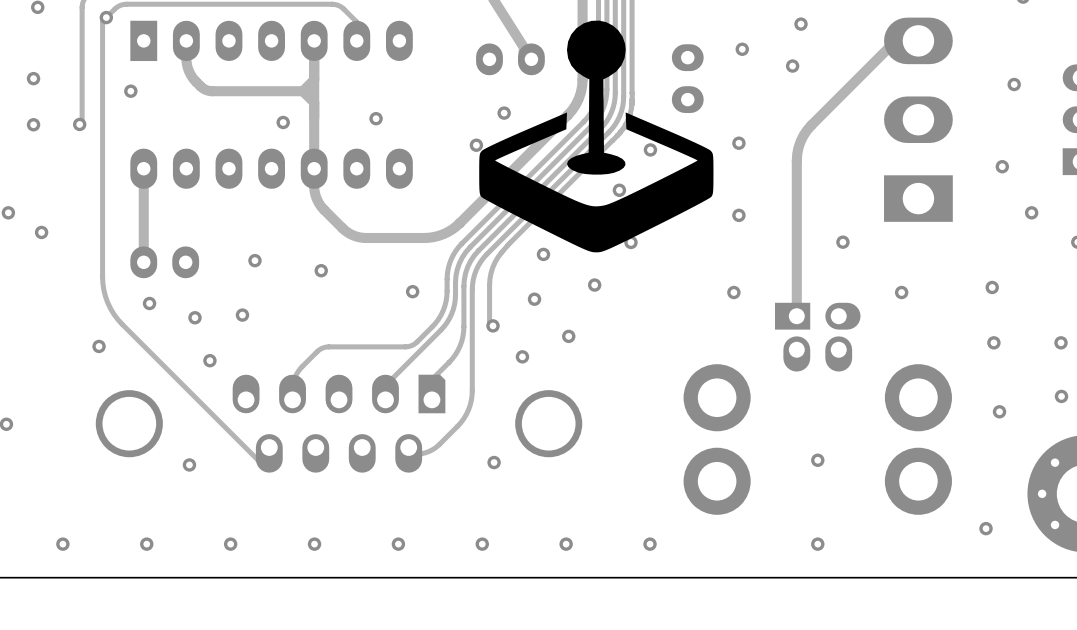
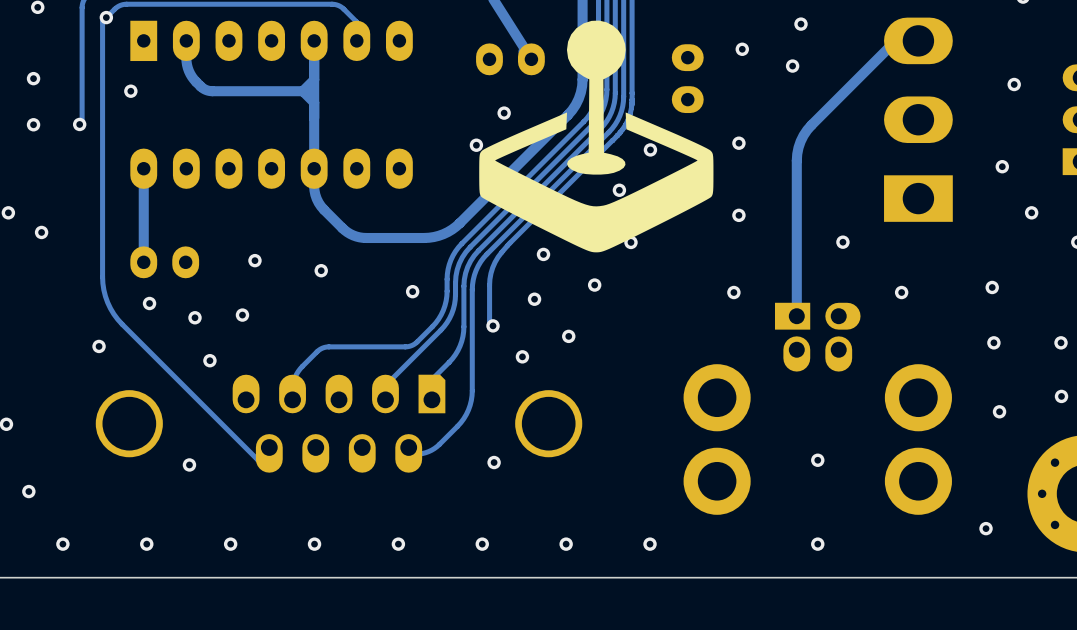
via: (376, 118) -> none
via: (283, 122) -> none
via: none -> (28, 491)

